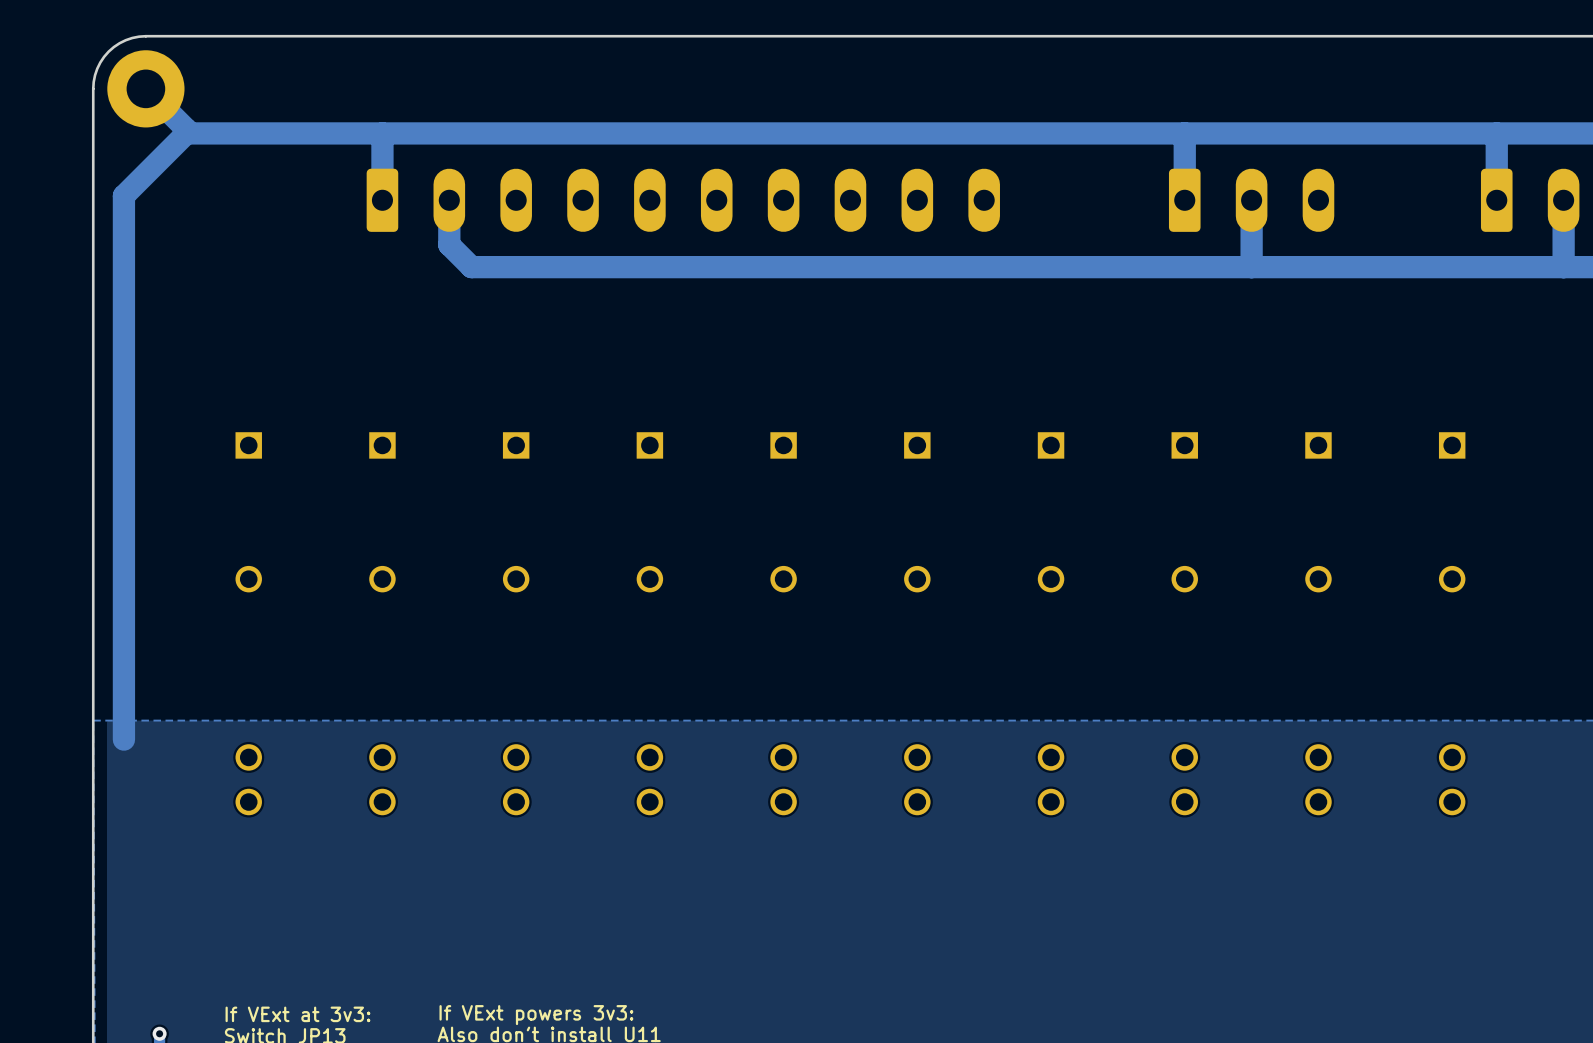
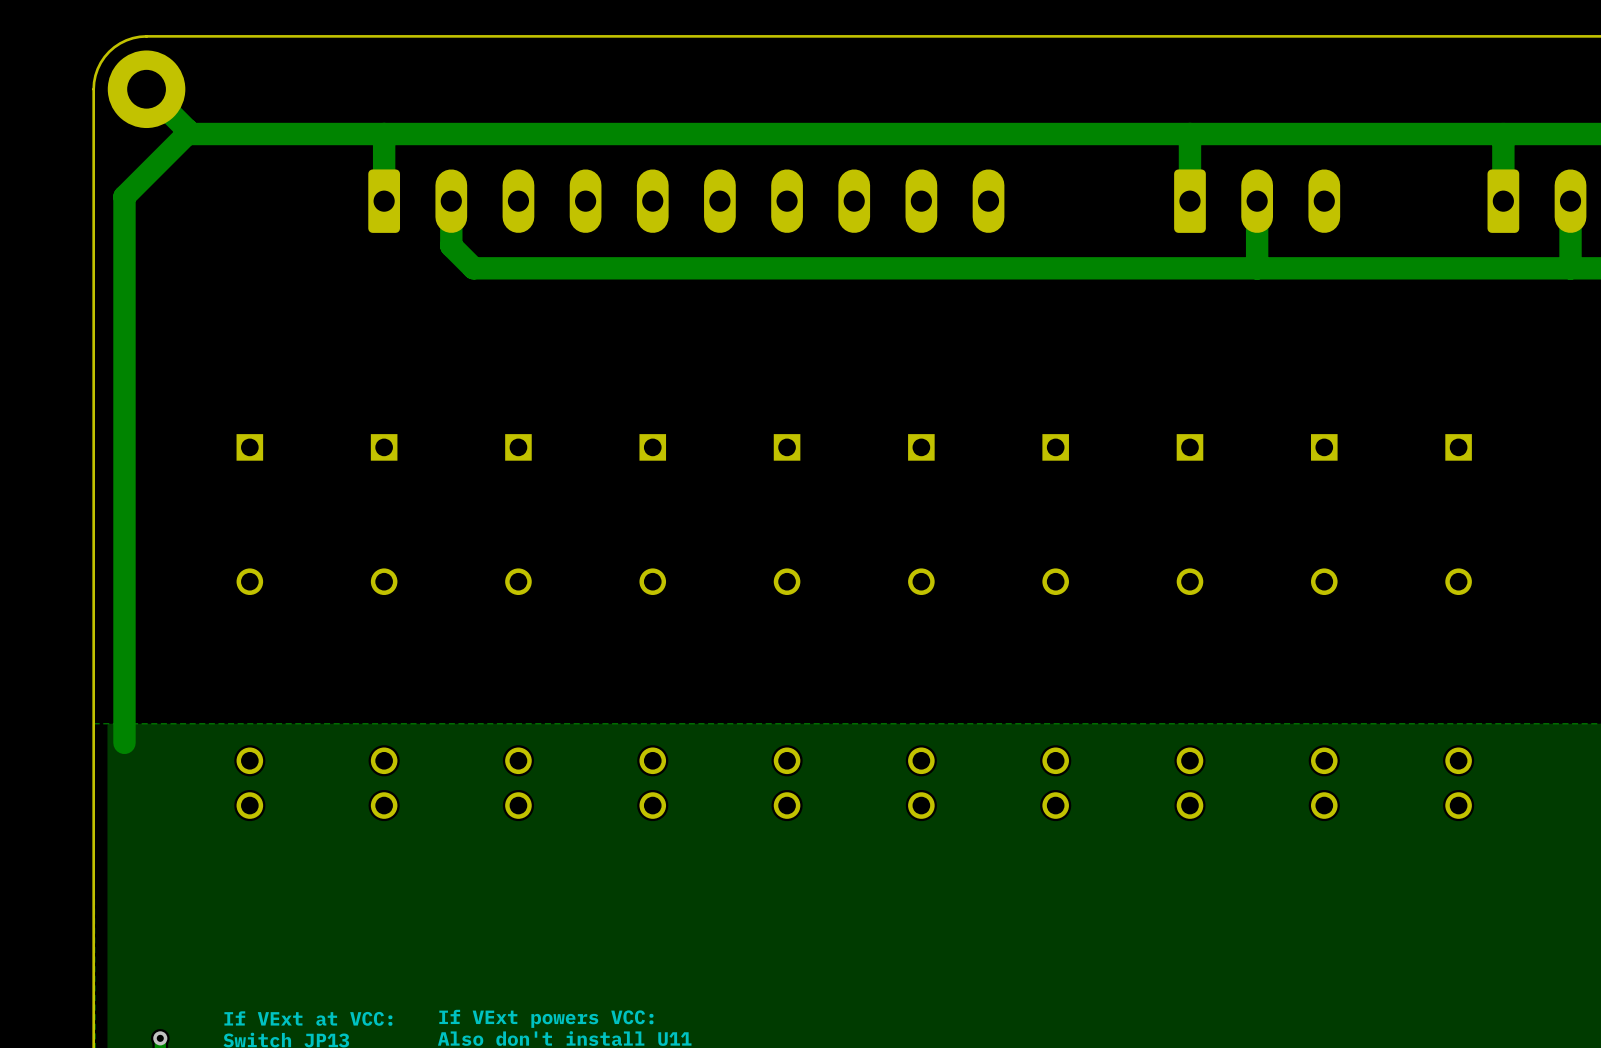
text: If VExt at 3v3: (297, 1014) -> If VExt at VCC: (308, 1018)
text: If VExt powers 3v3: (536, 1015) -> If VExt powers VCC: (546, 1018)

